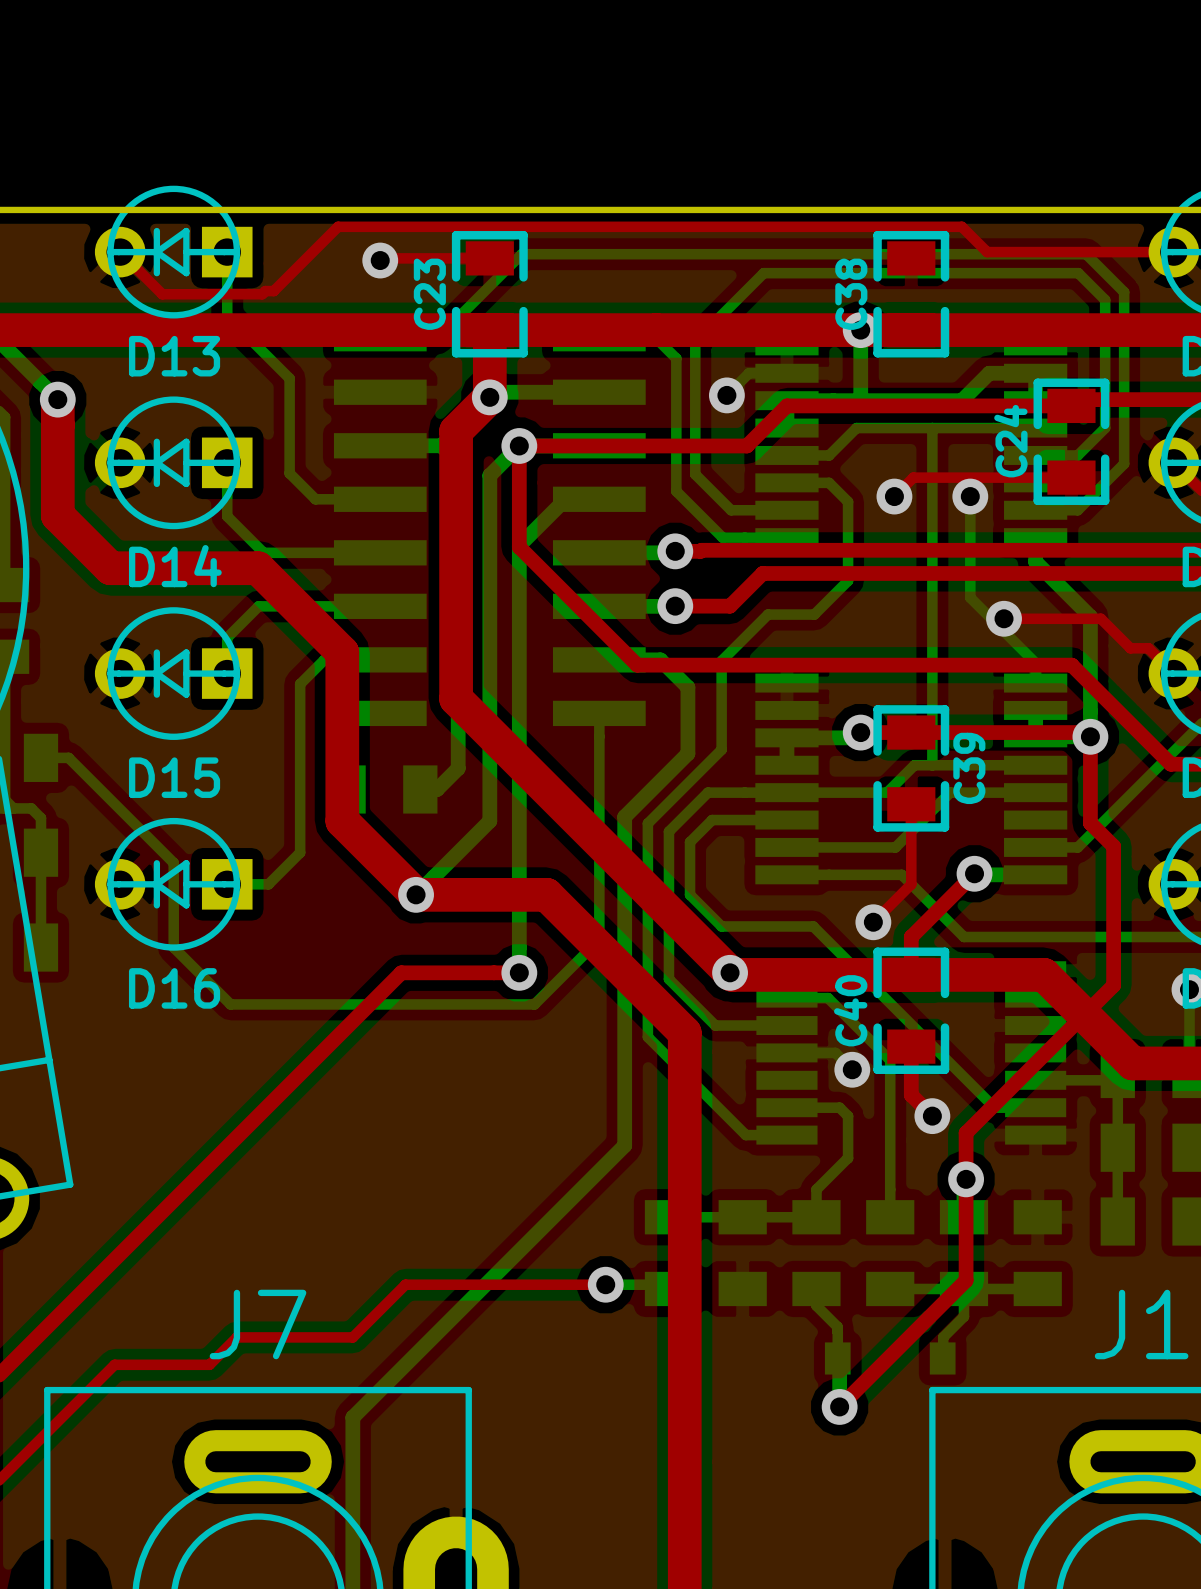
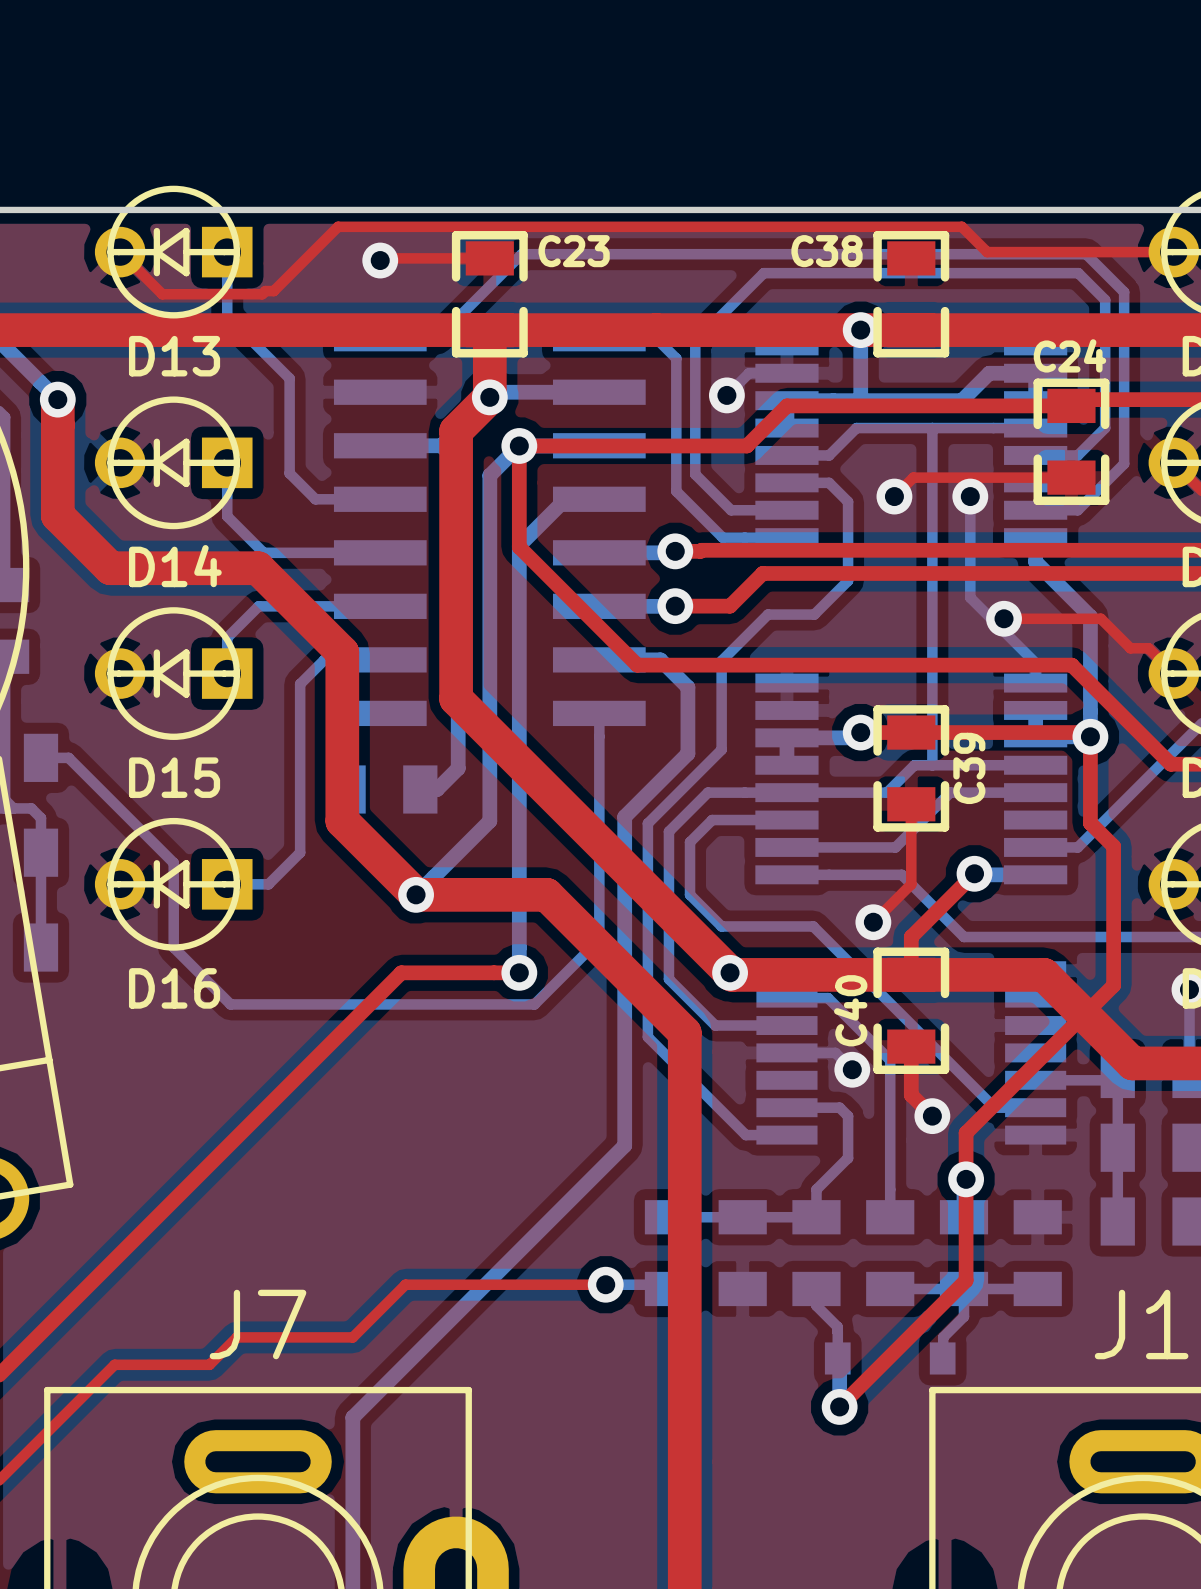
C23 name rotation: 0° (429, 294) -> 90° clockwise (574, 251)
C23 name position: C23 (429, 294) -> C23 (574, 251)
C38 name rotation: 0° (851, 294) -> 90° clockwise (827, 251)
C24 name rotation: 0° (1010, 441) -> 90° clockwise (1069, 355)
C24 name position: C24 (1010, 441) -> C24 (1069, 355)

